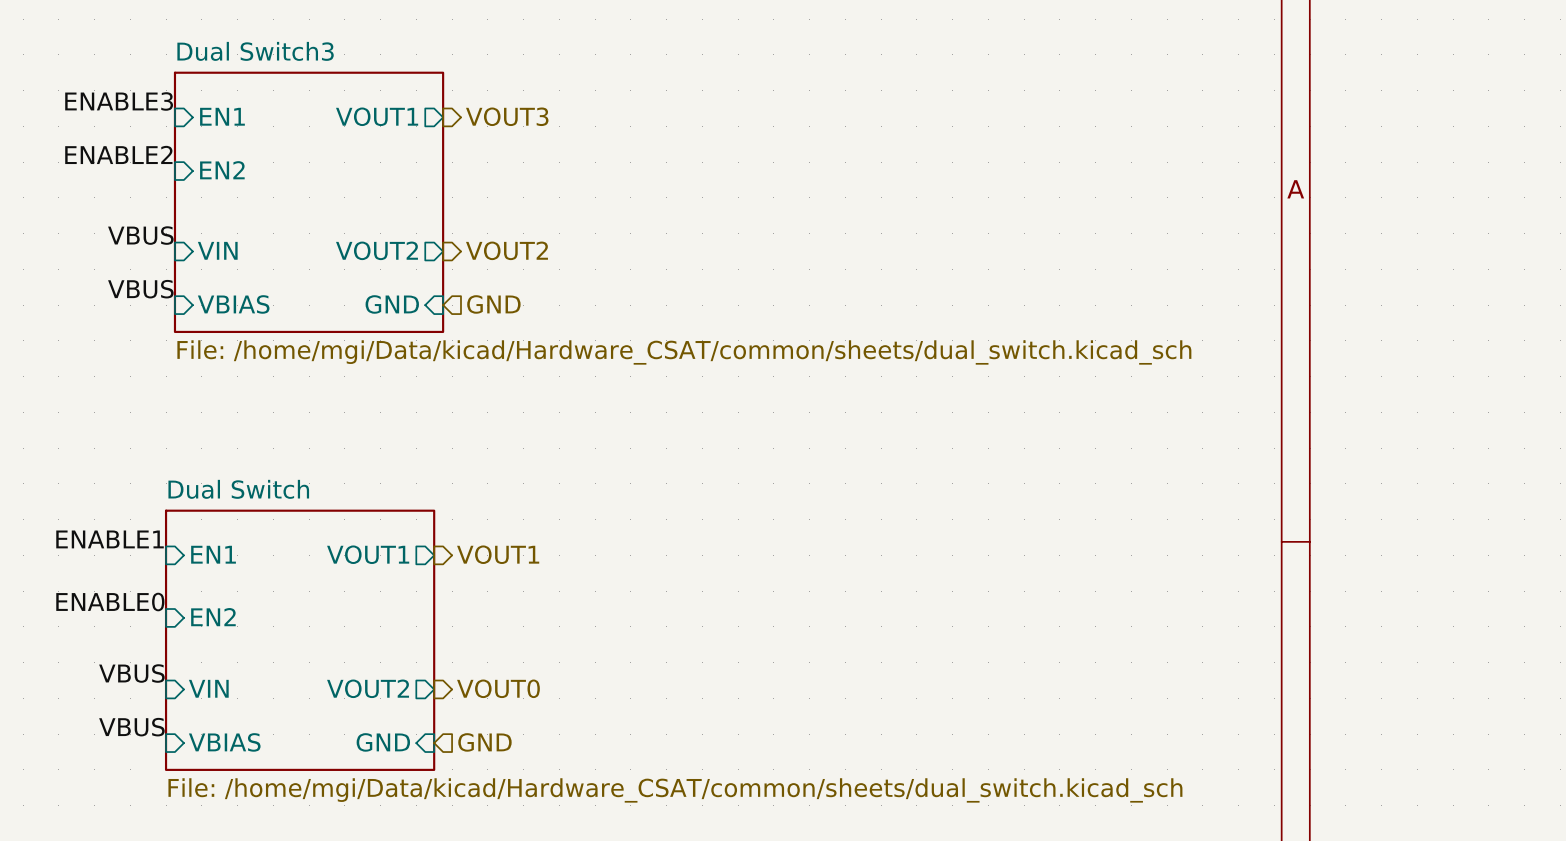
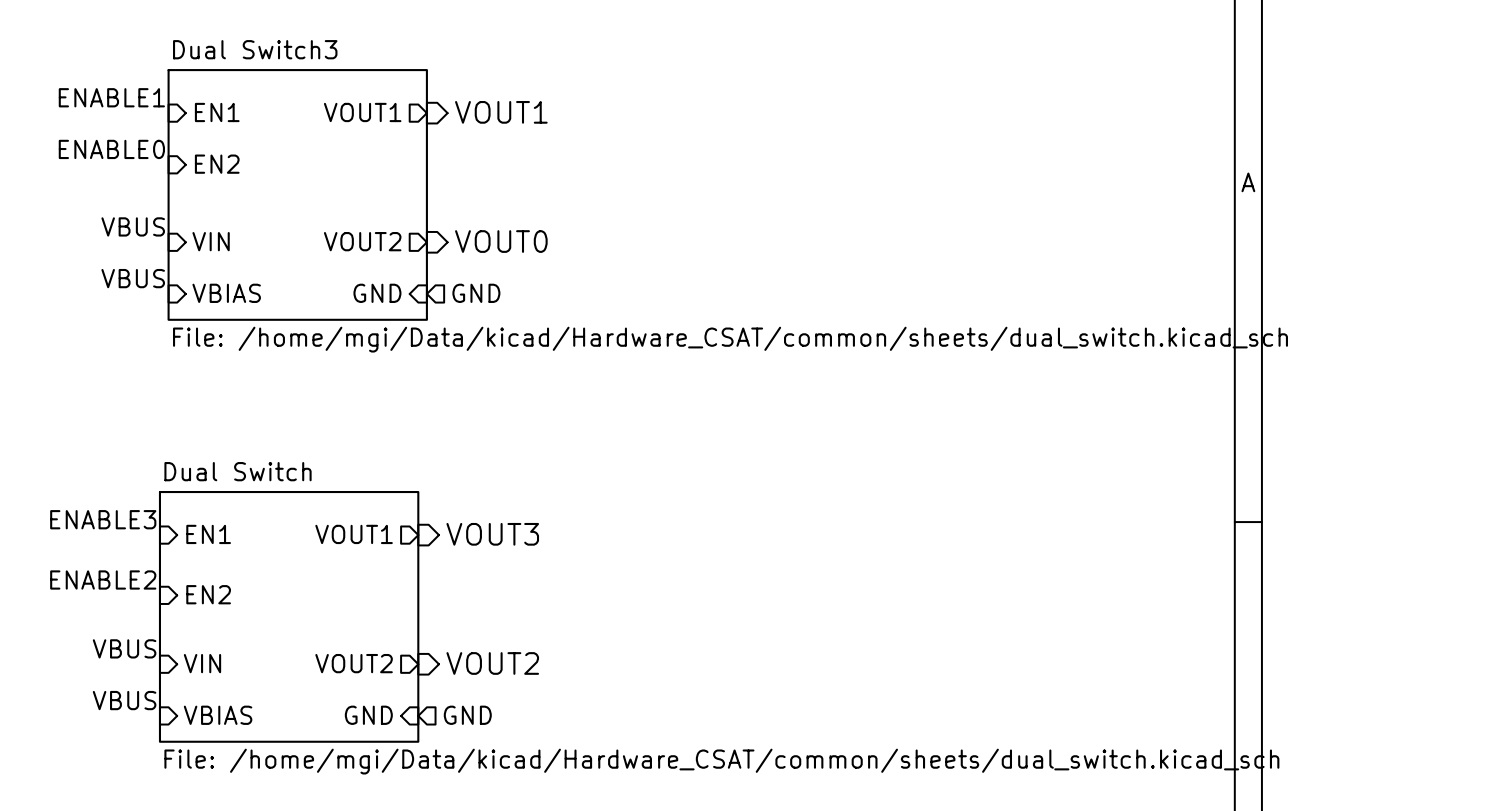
label: ENABLE3 (119, 101) -> ENABLE1 (111, 97)
hierarchical label: VOUT3 (507, 116) -> VOUT1 (501, 112)
label: ENABLE2 (118, 154) -> ENABLE0 (111, 149)
hierarchical label: VOUT2 (506, 250) -> VOUT0 (501, 241)
label: ENABLE1 (110, 539) -> ENABLE3 (103, 519)
hierarchical label: VOUT1 (498, 554) -> VOUT3 (492, 534)
label: ENABLE0 (110, 602) -> ENABLE2 (103, 579)
hierarchical label: VOUT0 (498, 688) -> VOUT2 (492, 663)

